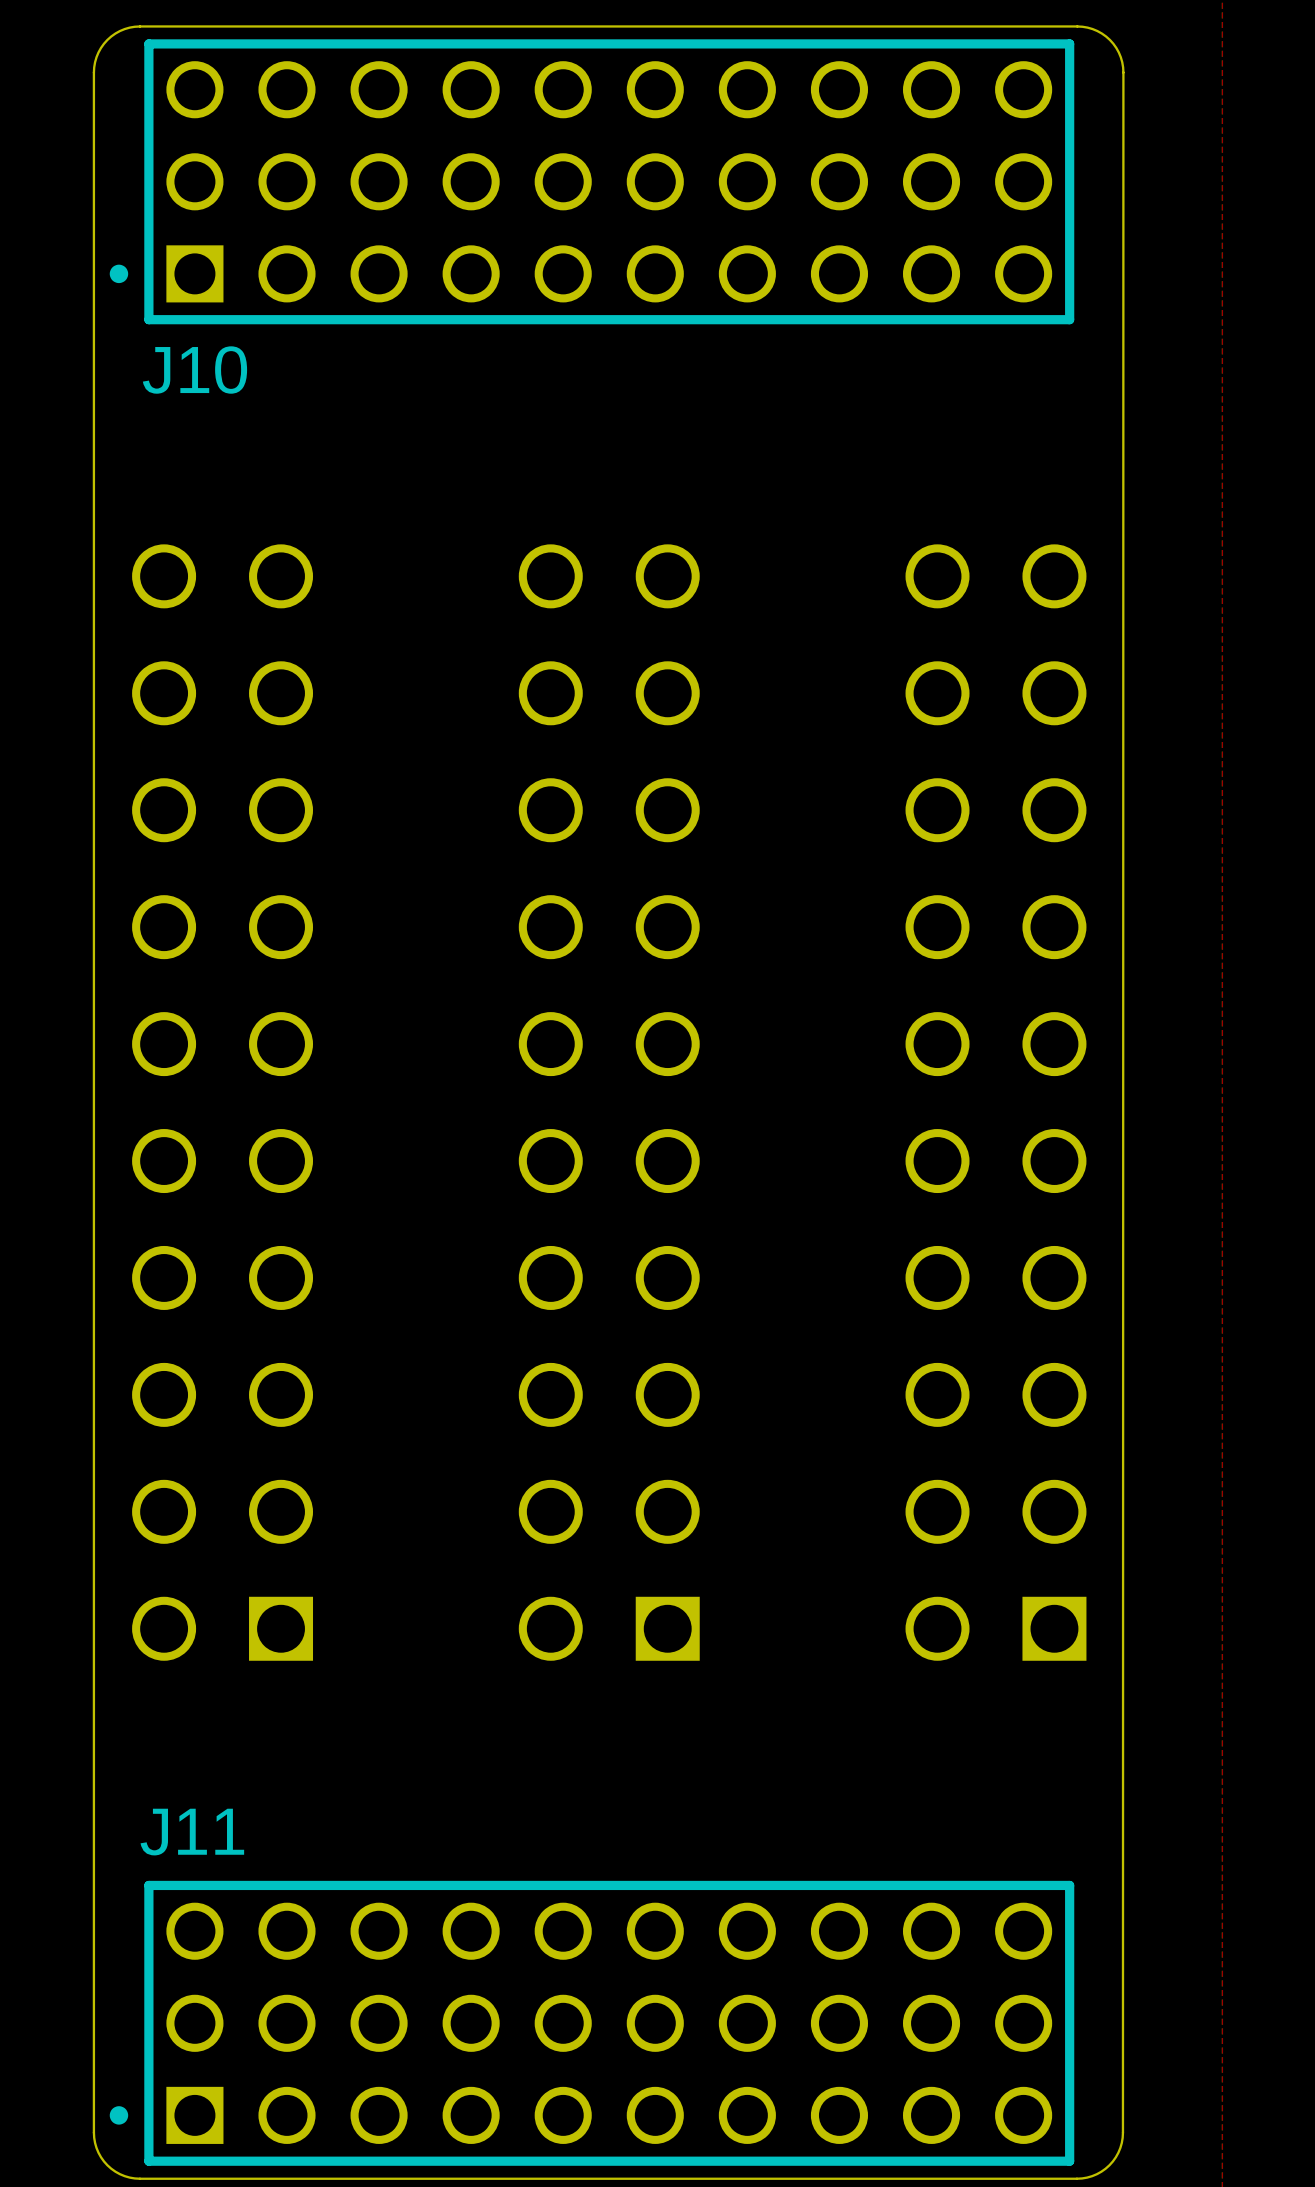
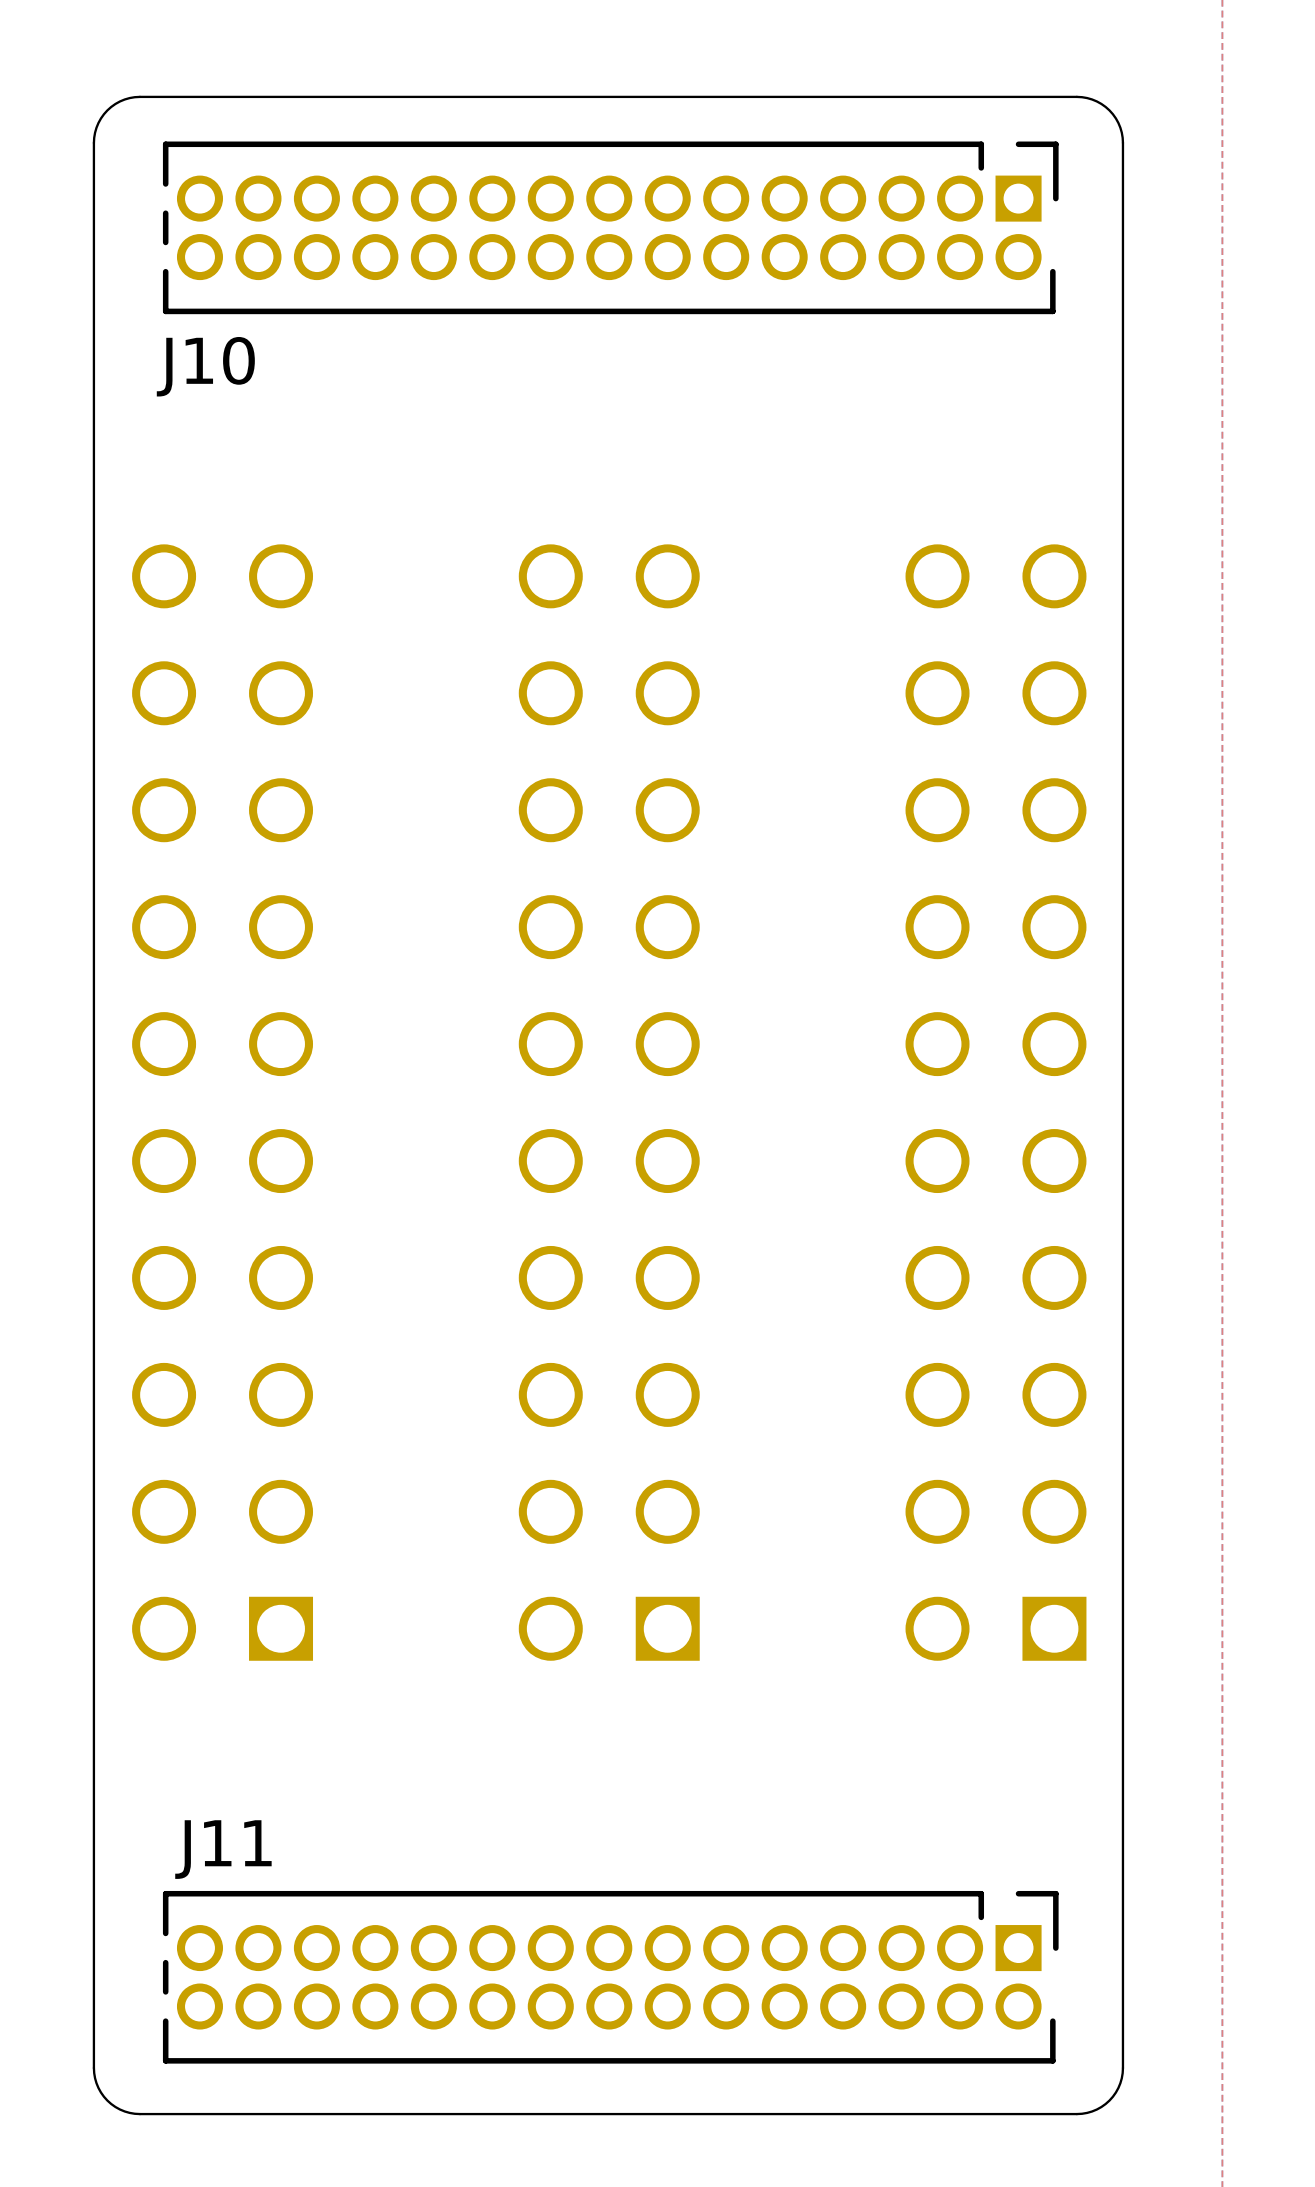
J10 footprint: [109, 39, 1075, 325] -> [162, 141, 1059, 315]
board edge: (93, 142) (93, 72) (96, 57) (103, 43) (111, 36) (124, 29) (134, 26) (1077, 26) (1092, 29) (1106, 36) (1118, 52) (1123, 67) (1122, 2132) (1118, 2152) (1112, 2161) (1101, 2171) (1092, 2176) (1076, 2178) (134, 2178) (124, 2176) (111, 2168) (100, 2157) (96, 2147) (93, 2132) (93, 2068) -> (93, 142) (98, 122) (107, 110) (119, 101) (139, 96) (1076, 96) (1096, 101) (1109, 110) (1120, 127) (1122, 142) (1122, 2068) (1118, 2088) (1112, 2096) (1101, 2107) (1087, 2112) (1076, 2114) (139, 2114) (124, 2111) (107, 2100) (98, 2088) (93, 2068)
J11 footprint: [109, 1880, 1075, 2166] -> [162, 1890, 1059, 2064]

